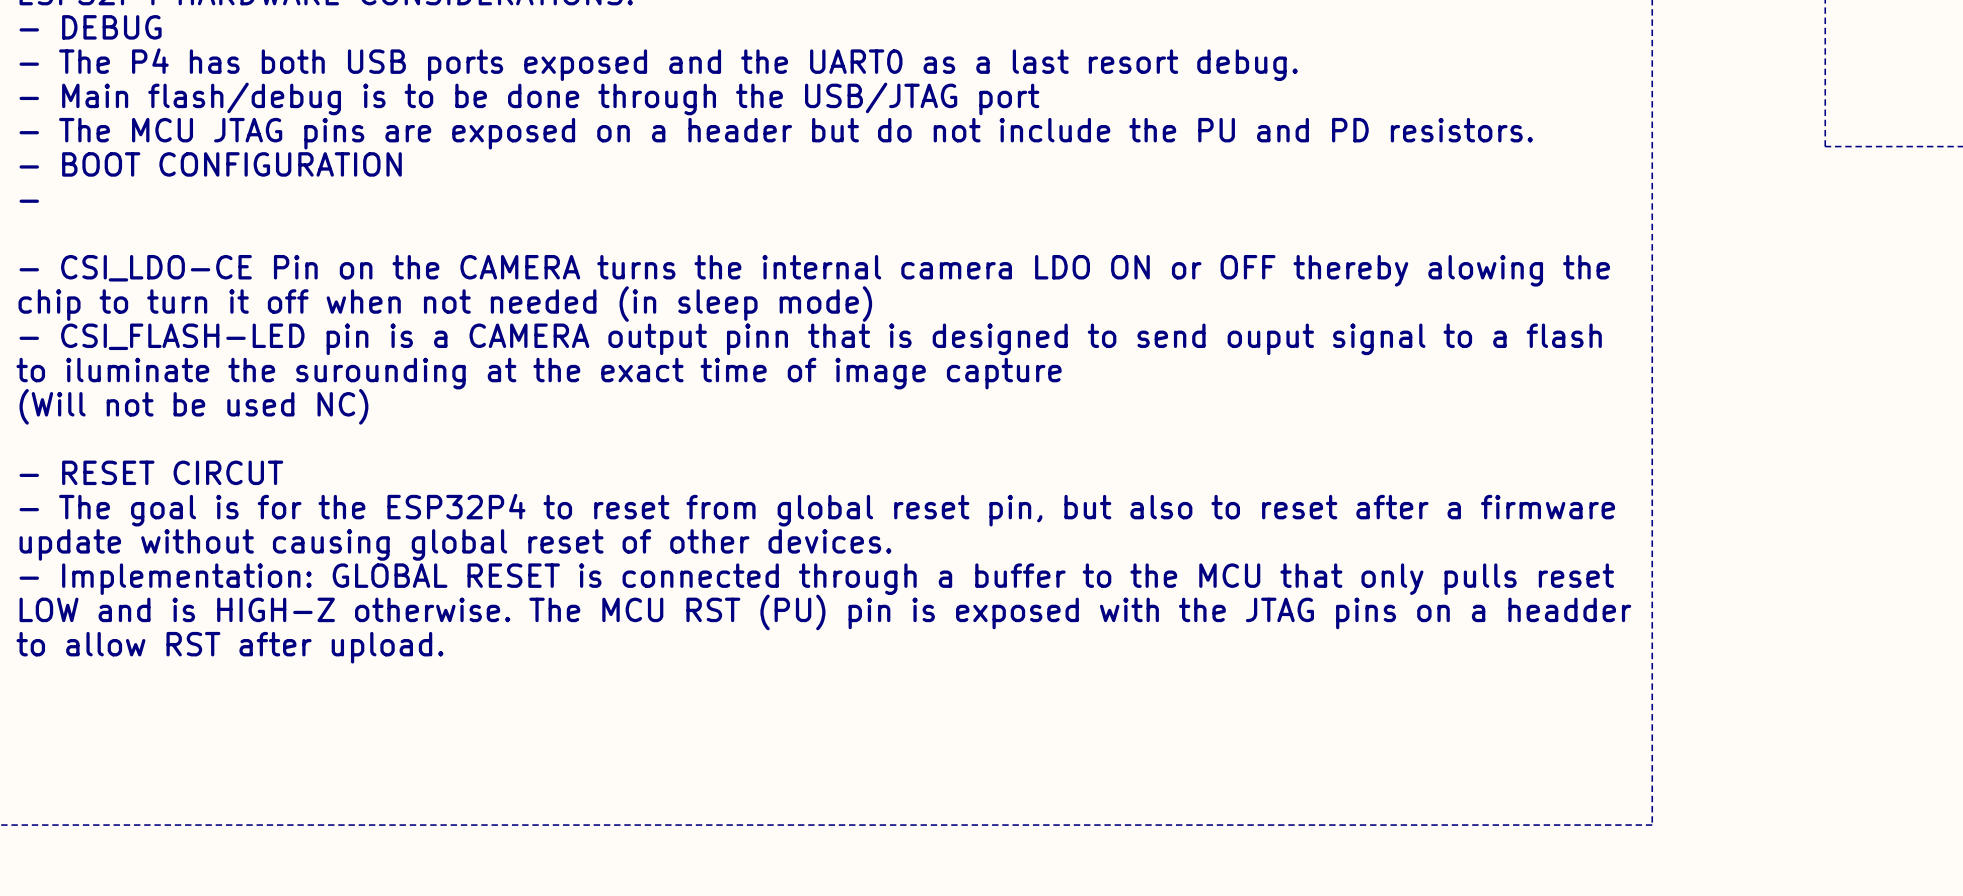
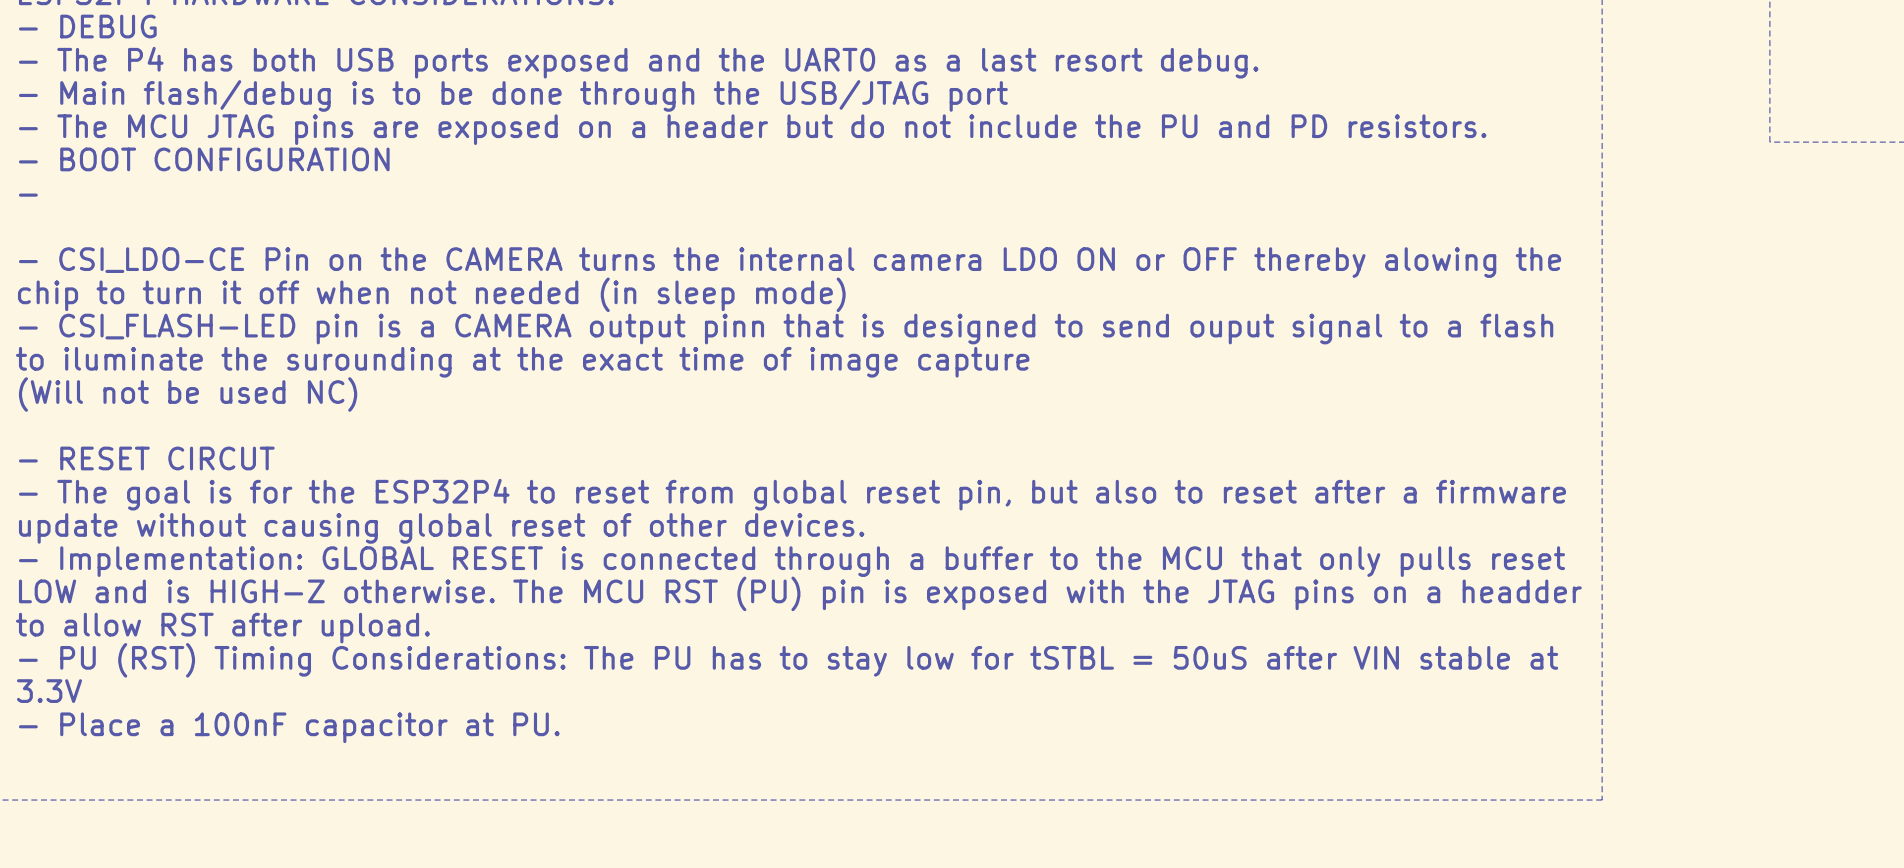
text: none -> - PU (RST) Timing Considerations: The PU has to stay low for tSTBL = 50uS after VIN stable at (788, 660)
text: none -> 3.3V (49, 691)
text: none -> - Place a 100nF capacitor at PU. (289, 727)

